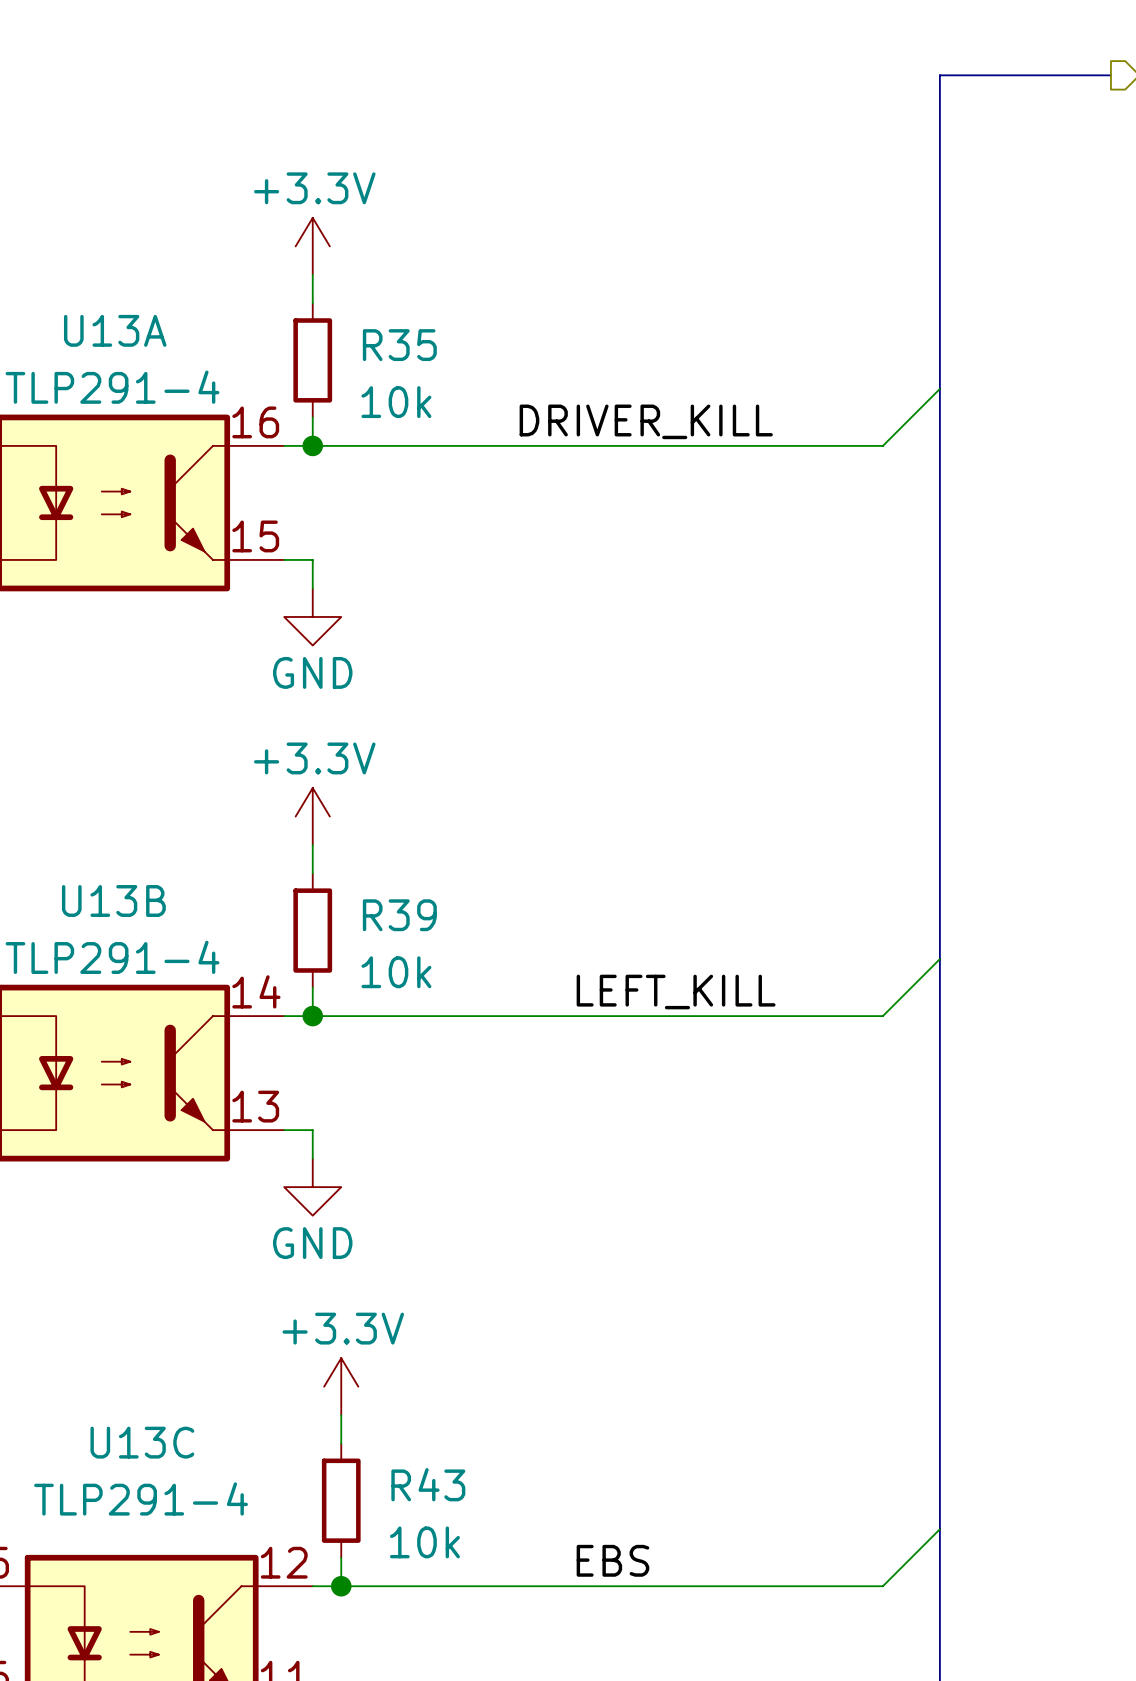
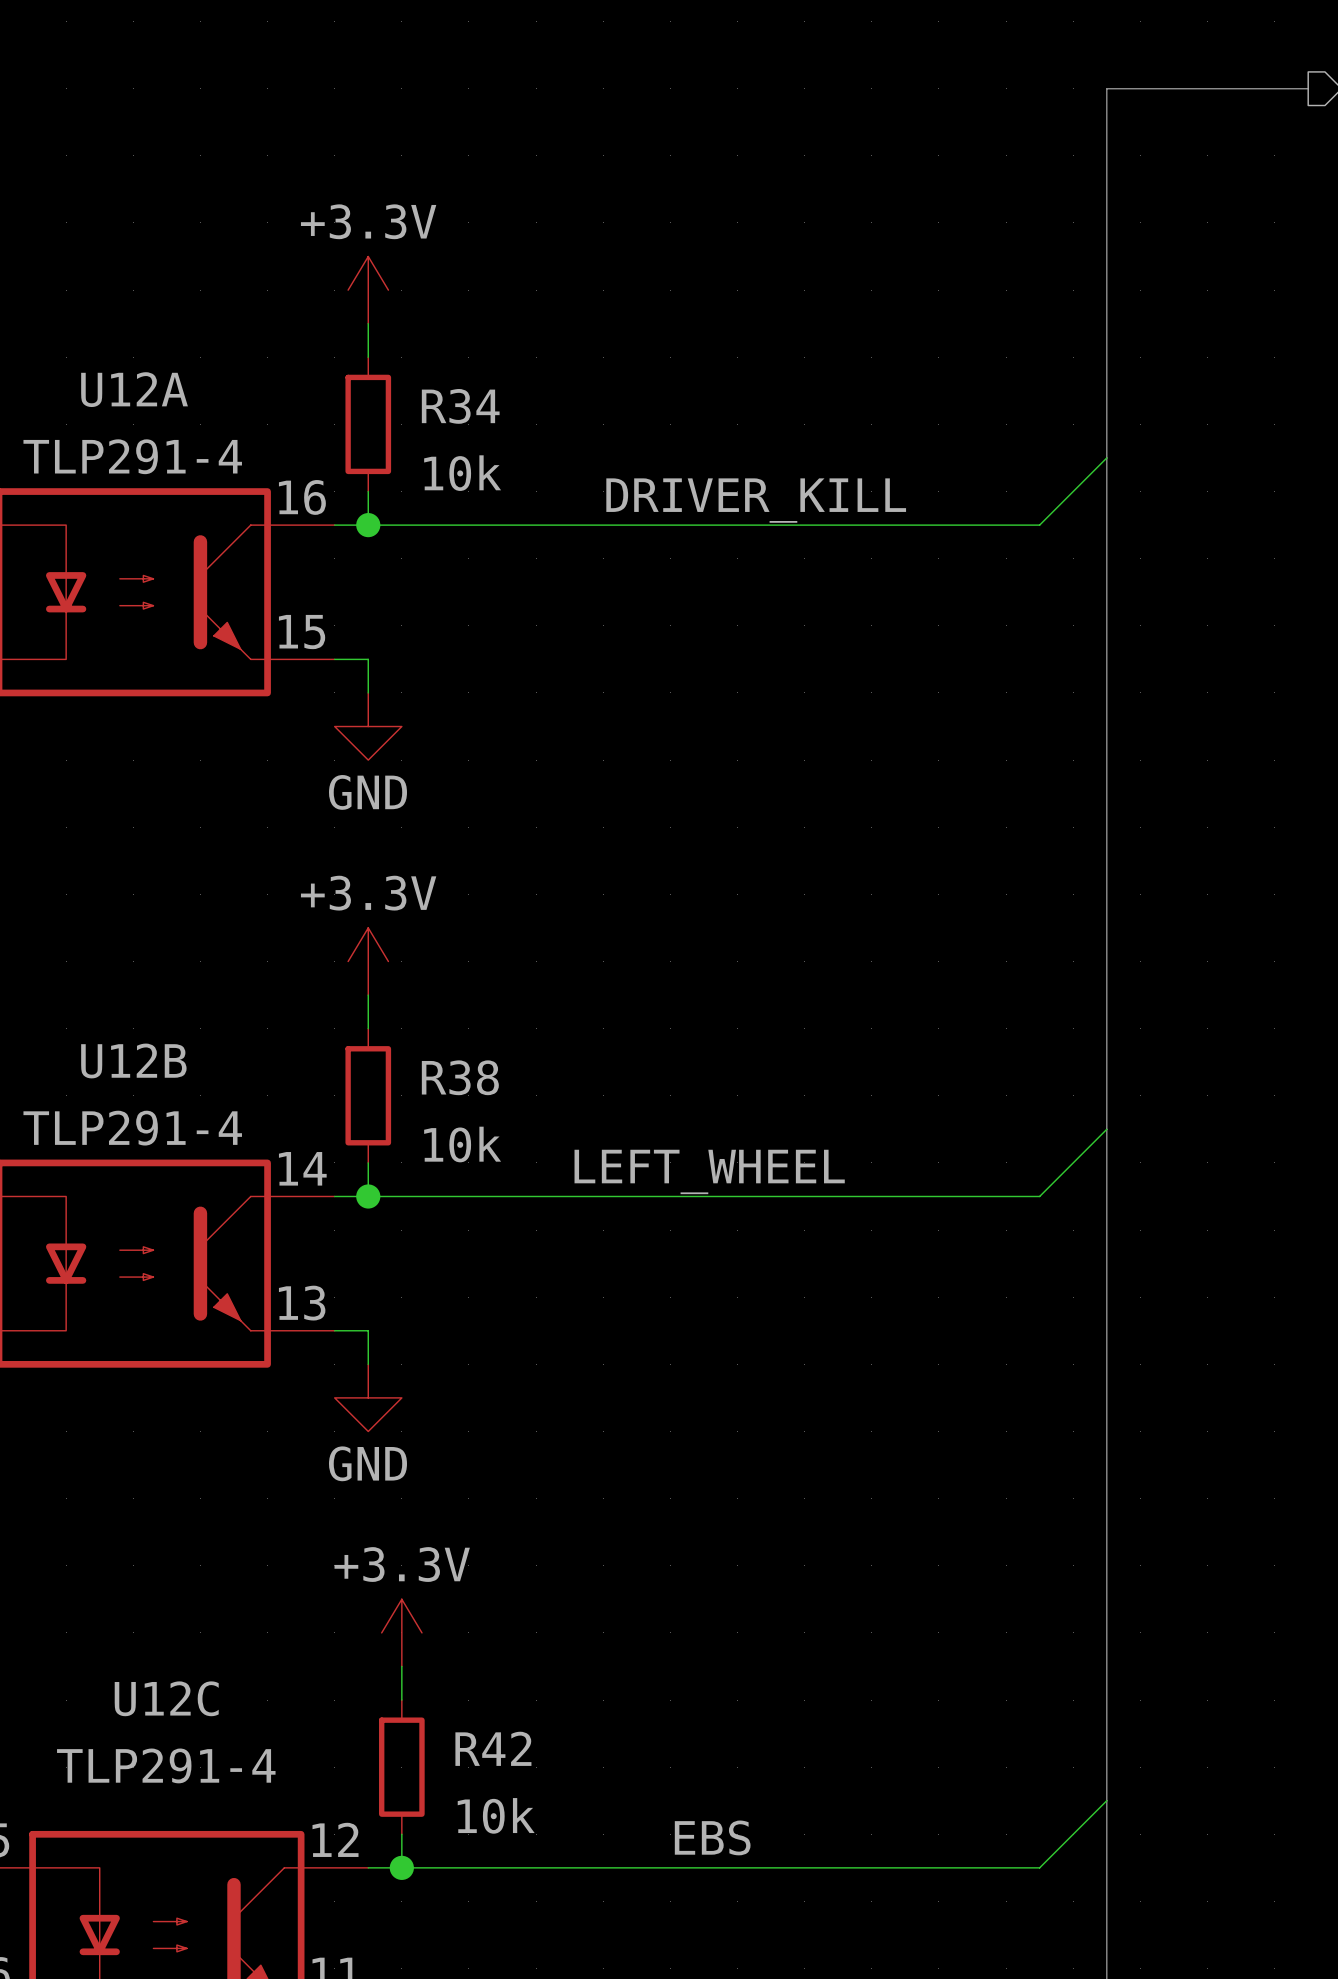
U13A name: U13A (115, 330) -> U12A (134, 389)
R35 name: R35 (399, 345) -> R34 (460, 406)
U13B name: U13B (113, 900) -> U12B (133, 1060)
R39 name: R39 (399, 915) -> R38 (460, 1077)
label: LEFT_KILL (676, 992) -> LEFT_WHEEL (709, 1171)
U13C name: U13C (142, 1442) -> U12C (166, 1698)
R43 name: R43 (428, 1484) -> R42 (493, 1748)

